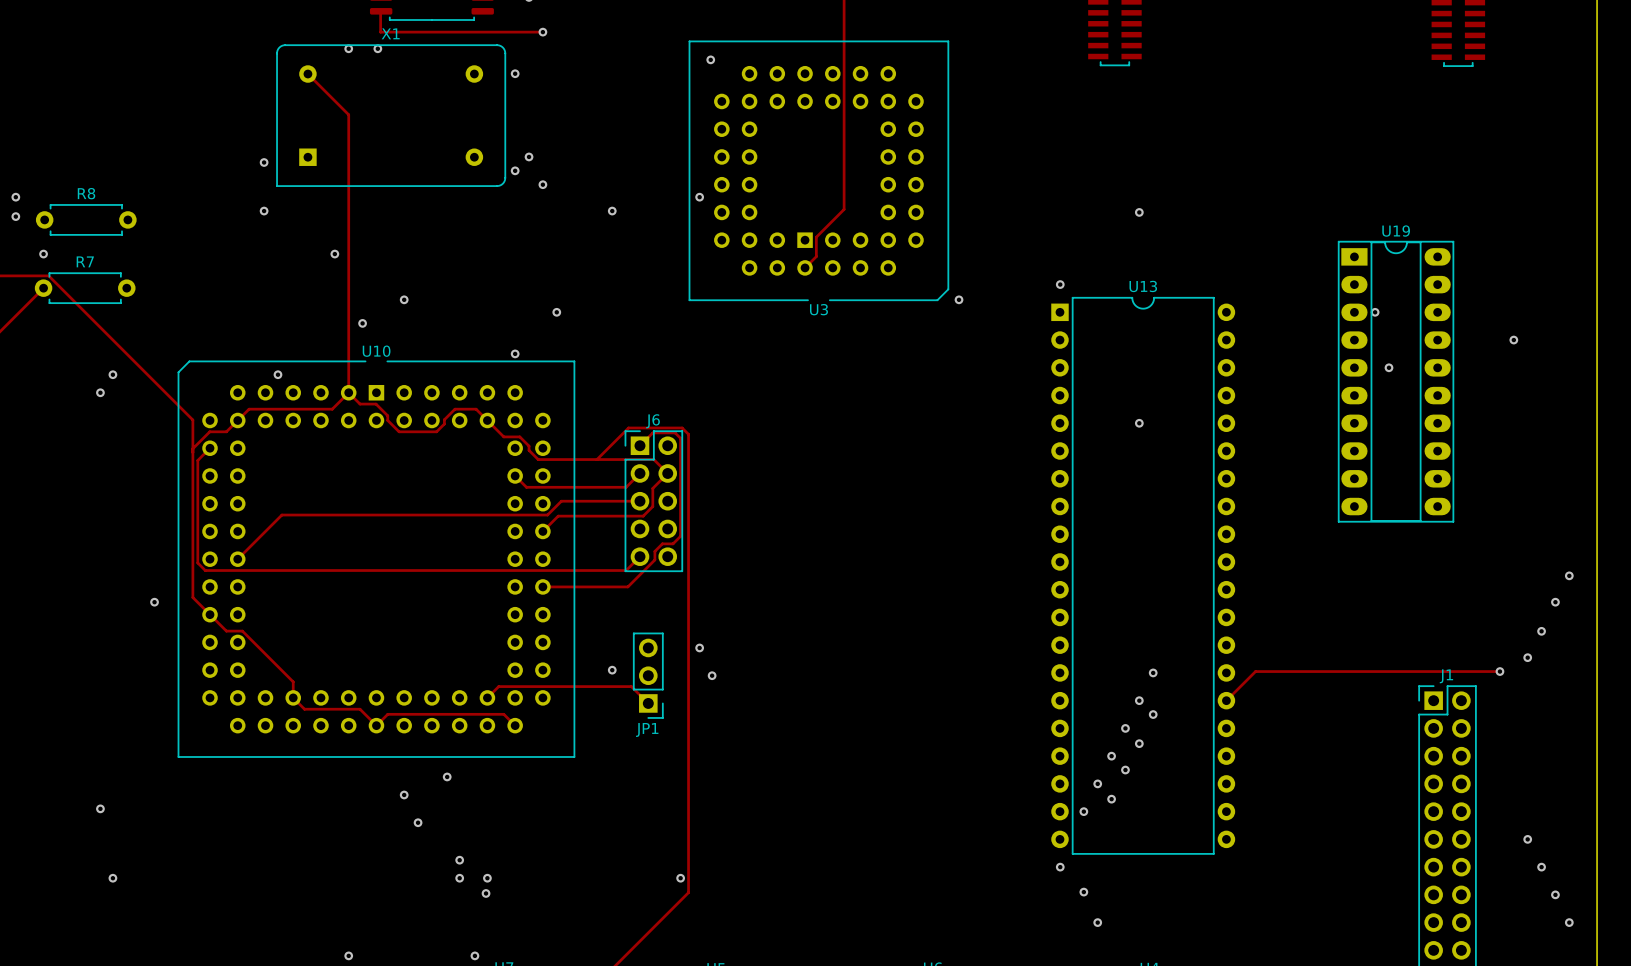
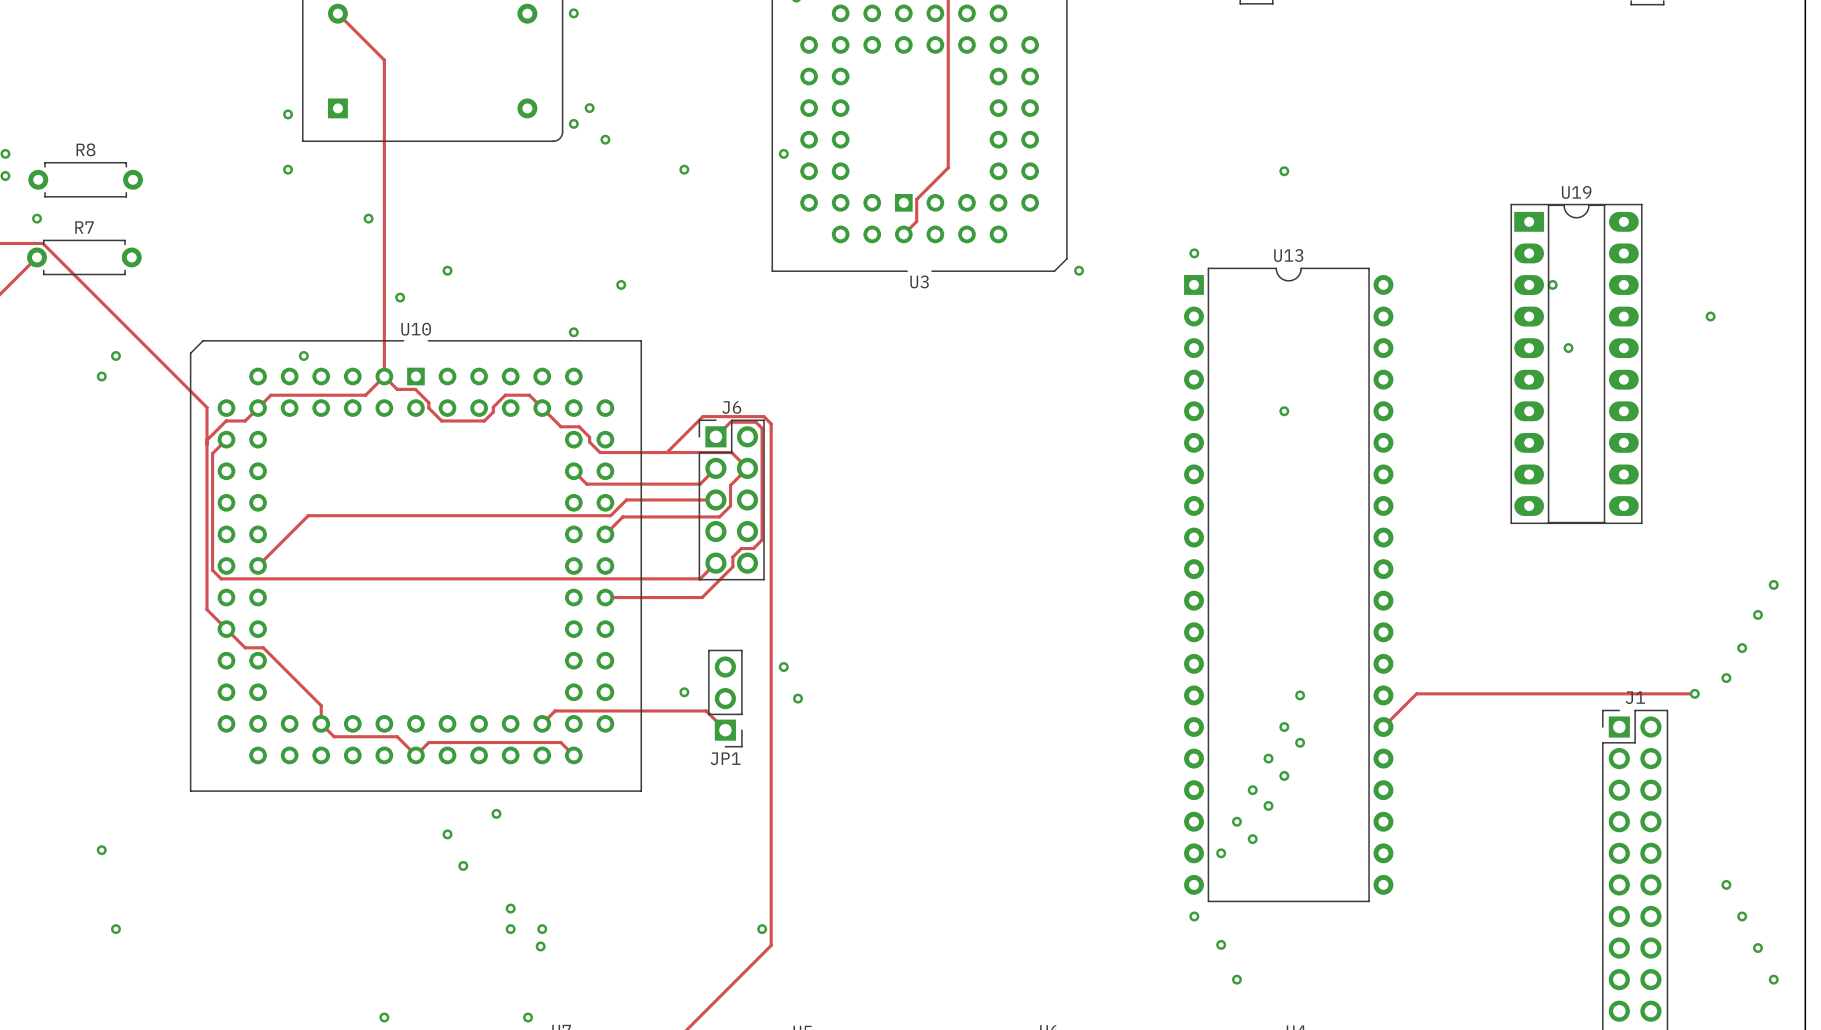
via: (154, 602) -> none

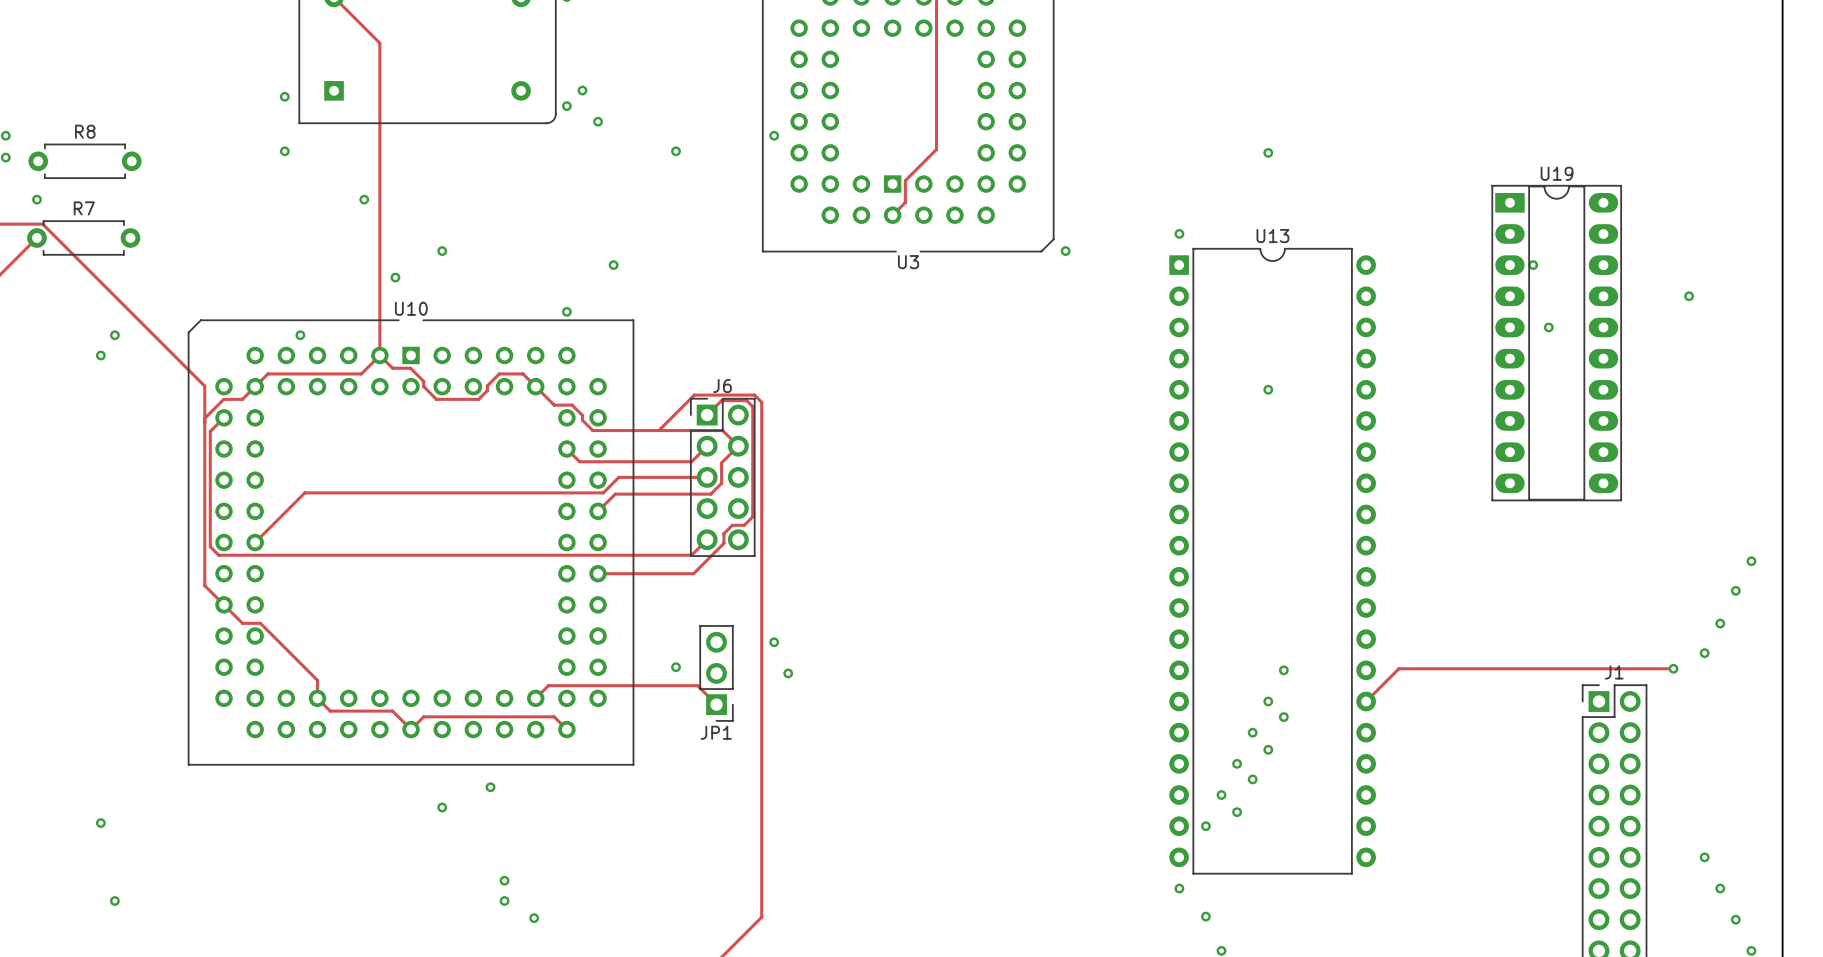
via: (463, 865) -> none
via: (542, 929) -> none
via: (762, 929) -> none

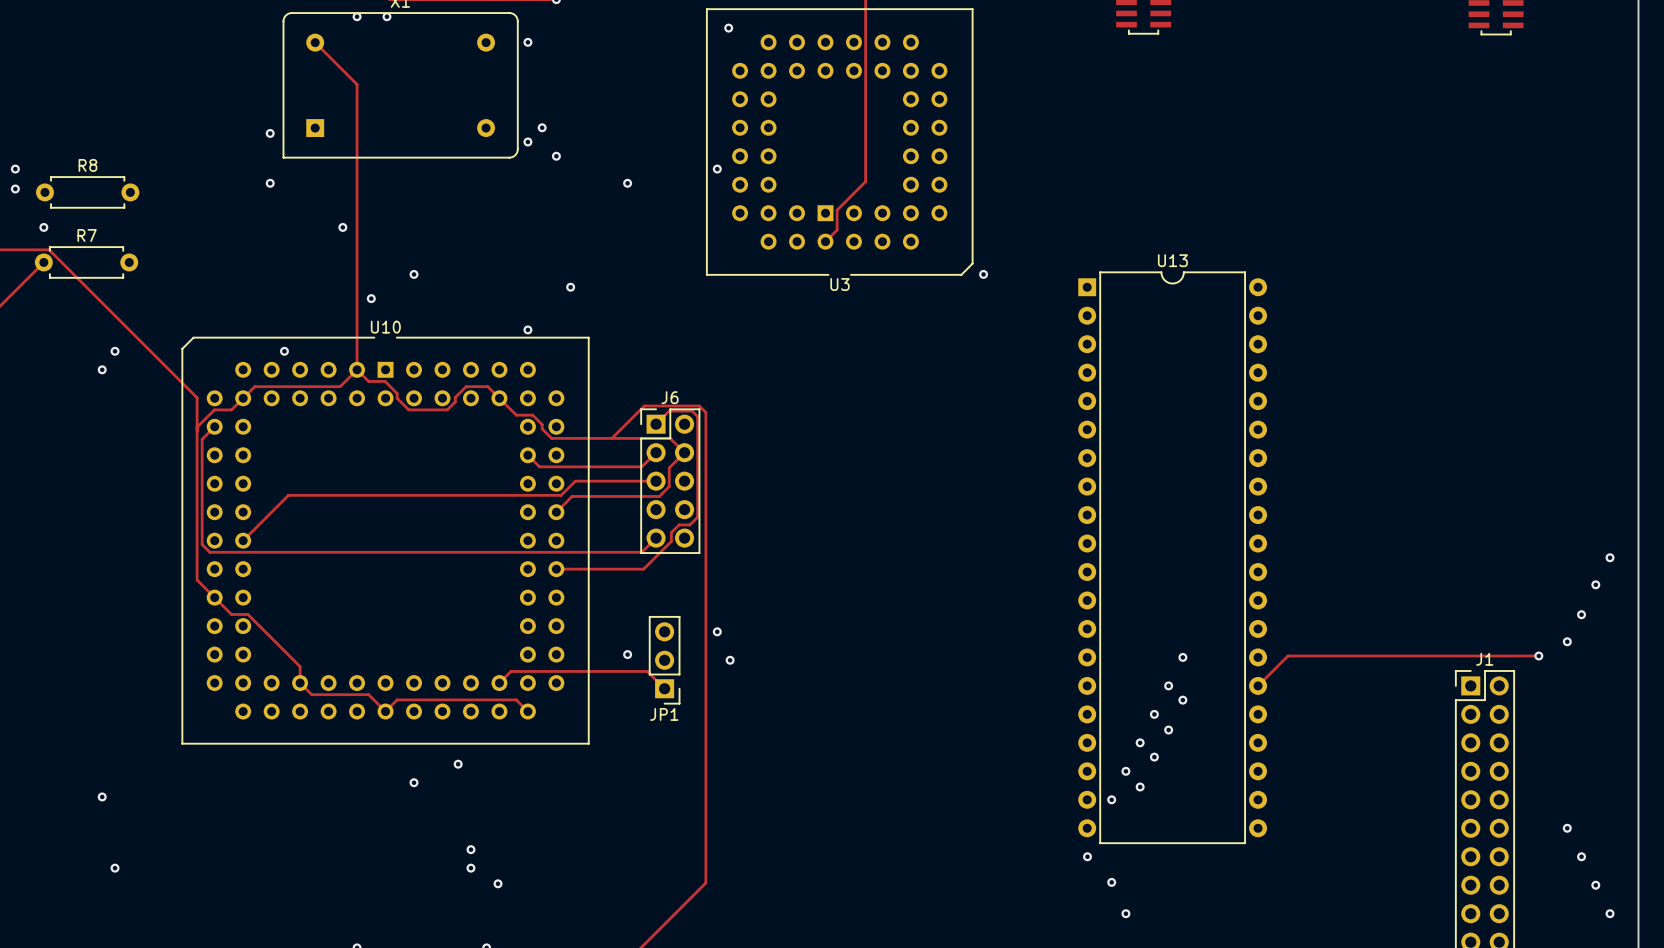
via: (1268, 152) -> none
via: (1179, 233) -> none
via: (1533, 265) -> none
via: (1689, 296) -> none
via: (1548, 327) -> none
U19: (1556, 343) -> none
via: (1268, 389) -> none

